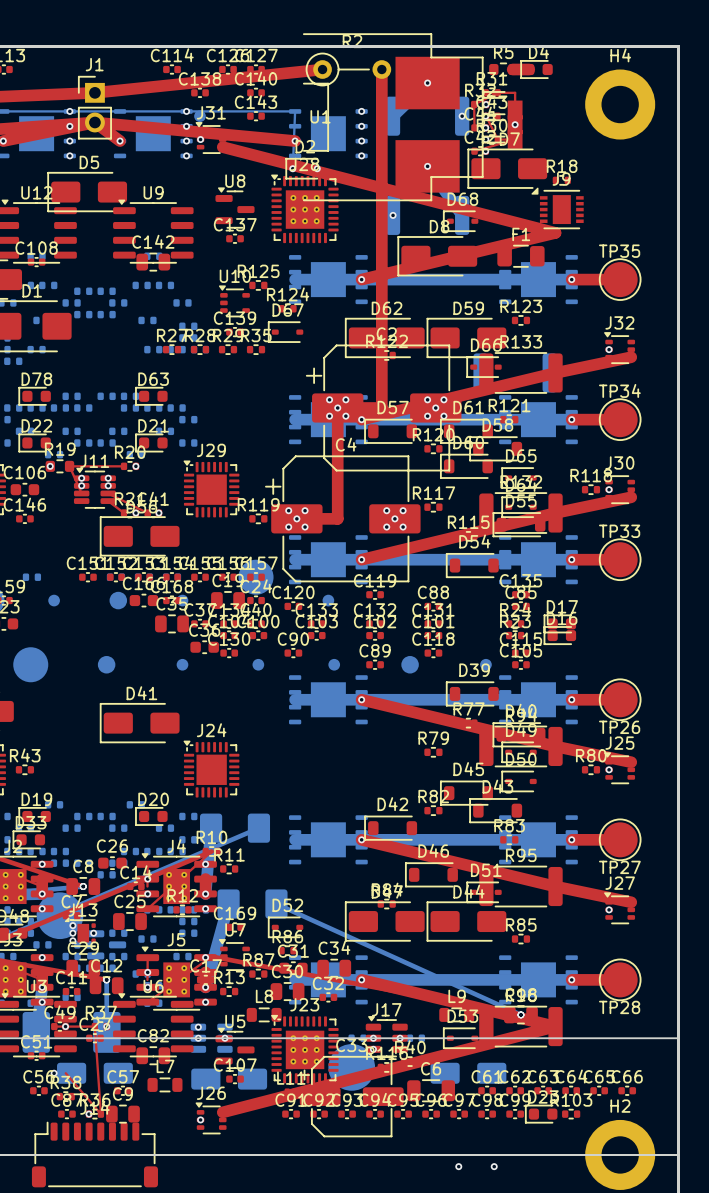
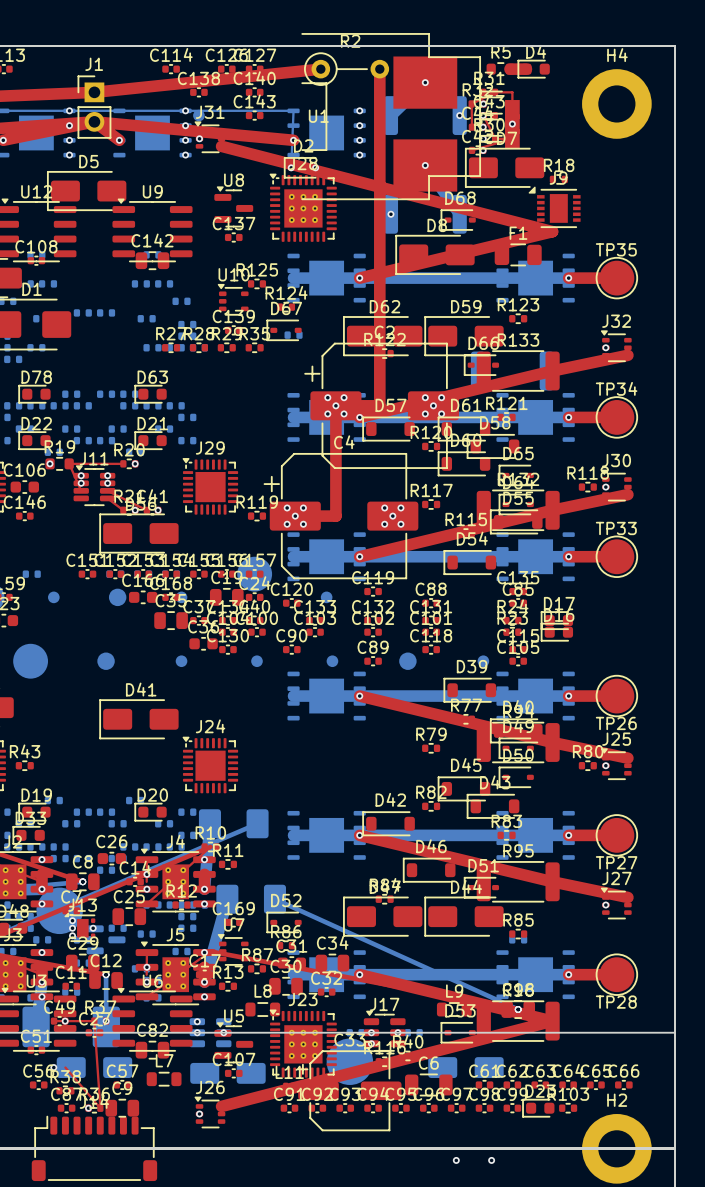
part: (83, 291) -> none
part: (106, 291) -> none
part: (71, 302) -> none
part: (118, 302) -> none
part: none -> (293, 335)
part: none -> (518, 939)
part: (71, 956) -> none
part: (118, 956) -> none
part: (106, 968) -> none

